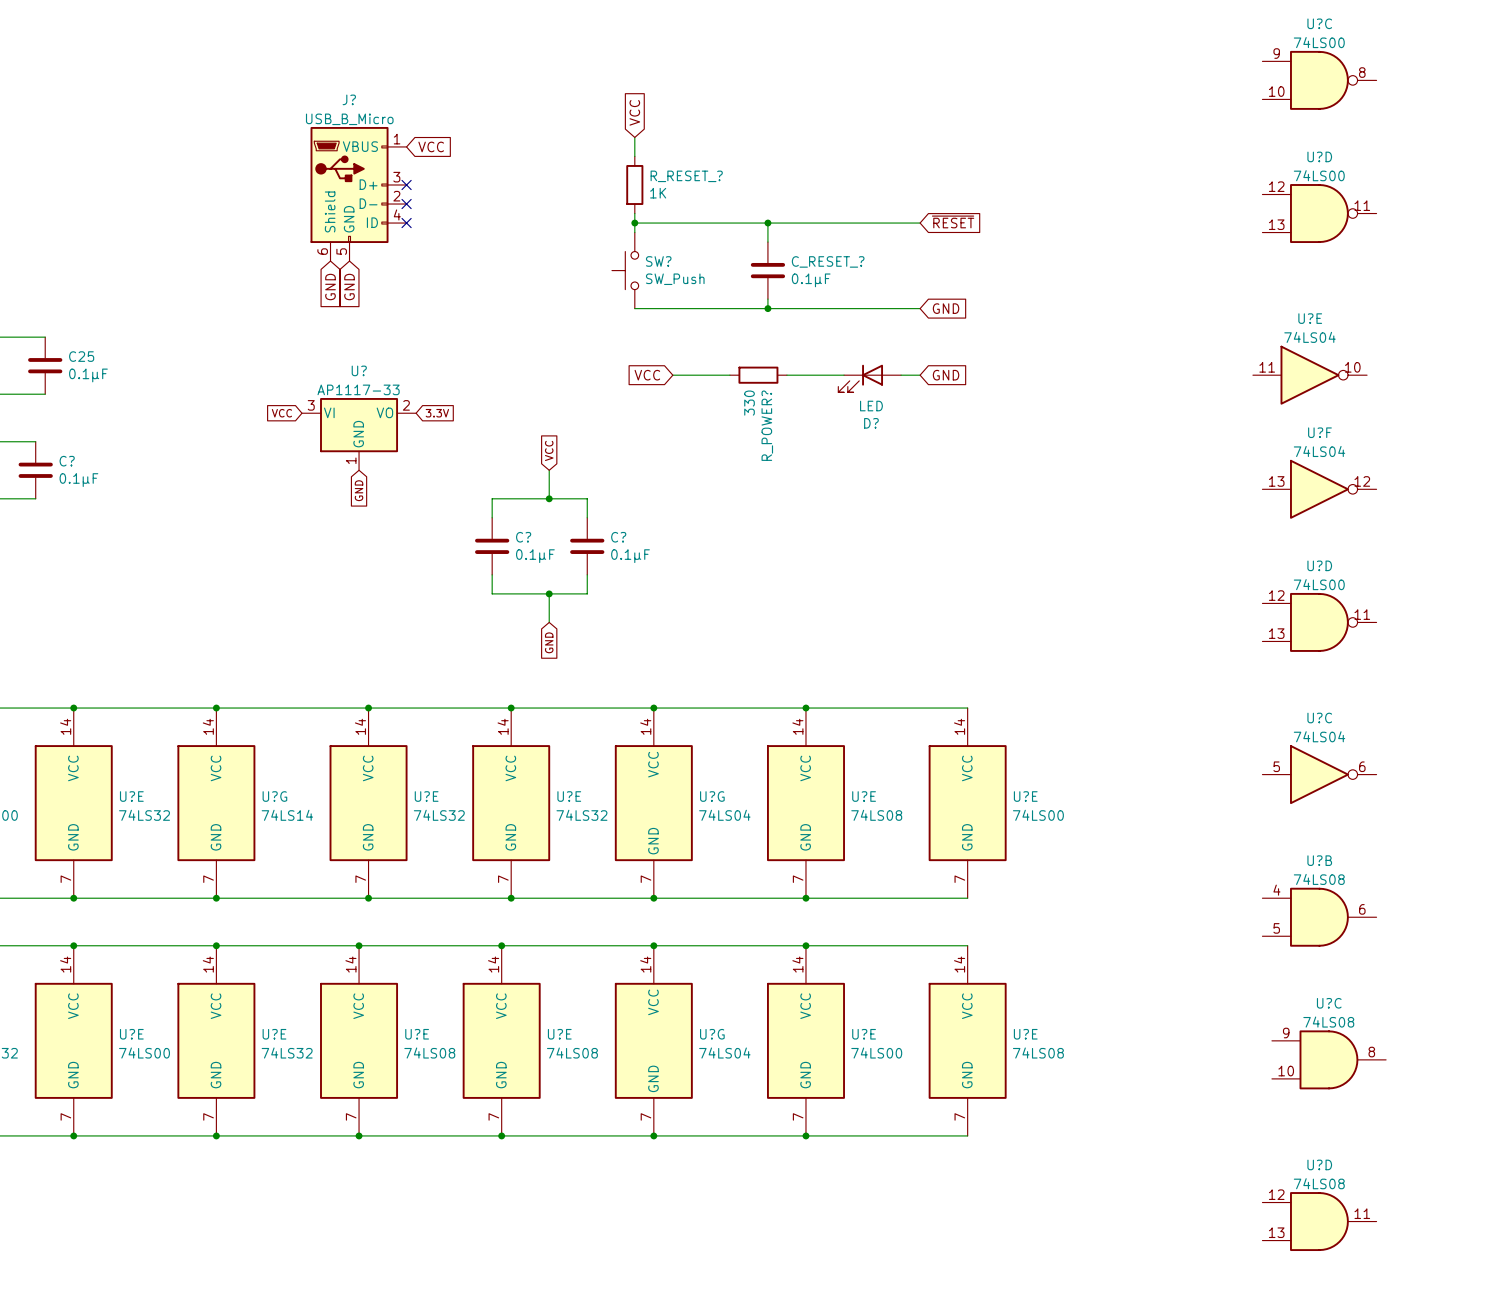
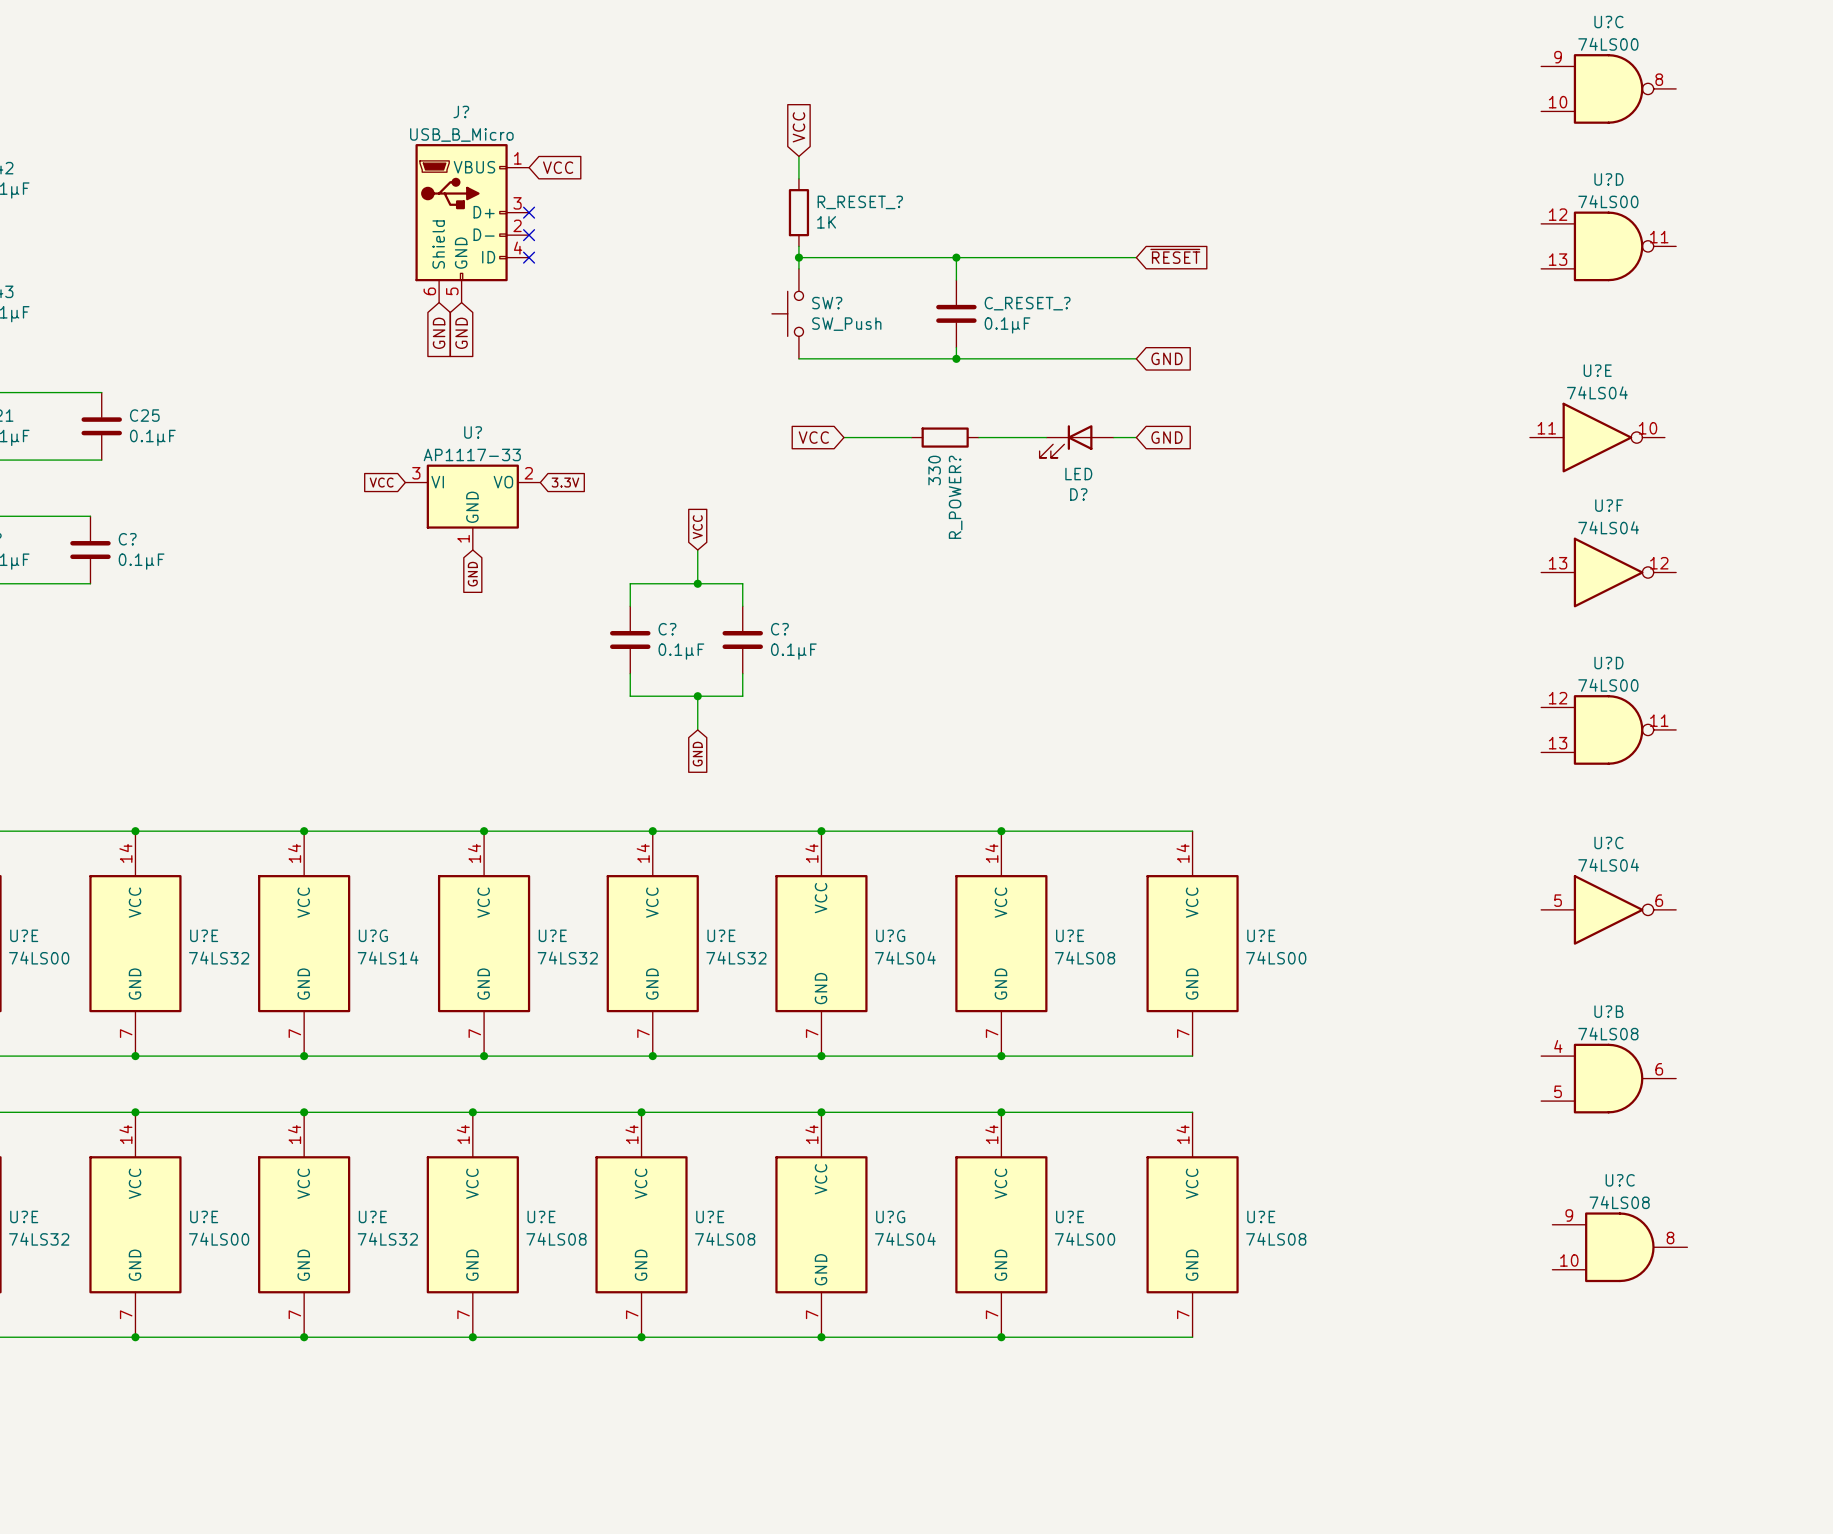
U?D: 74LS08 (1319, 1221) -> none

